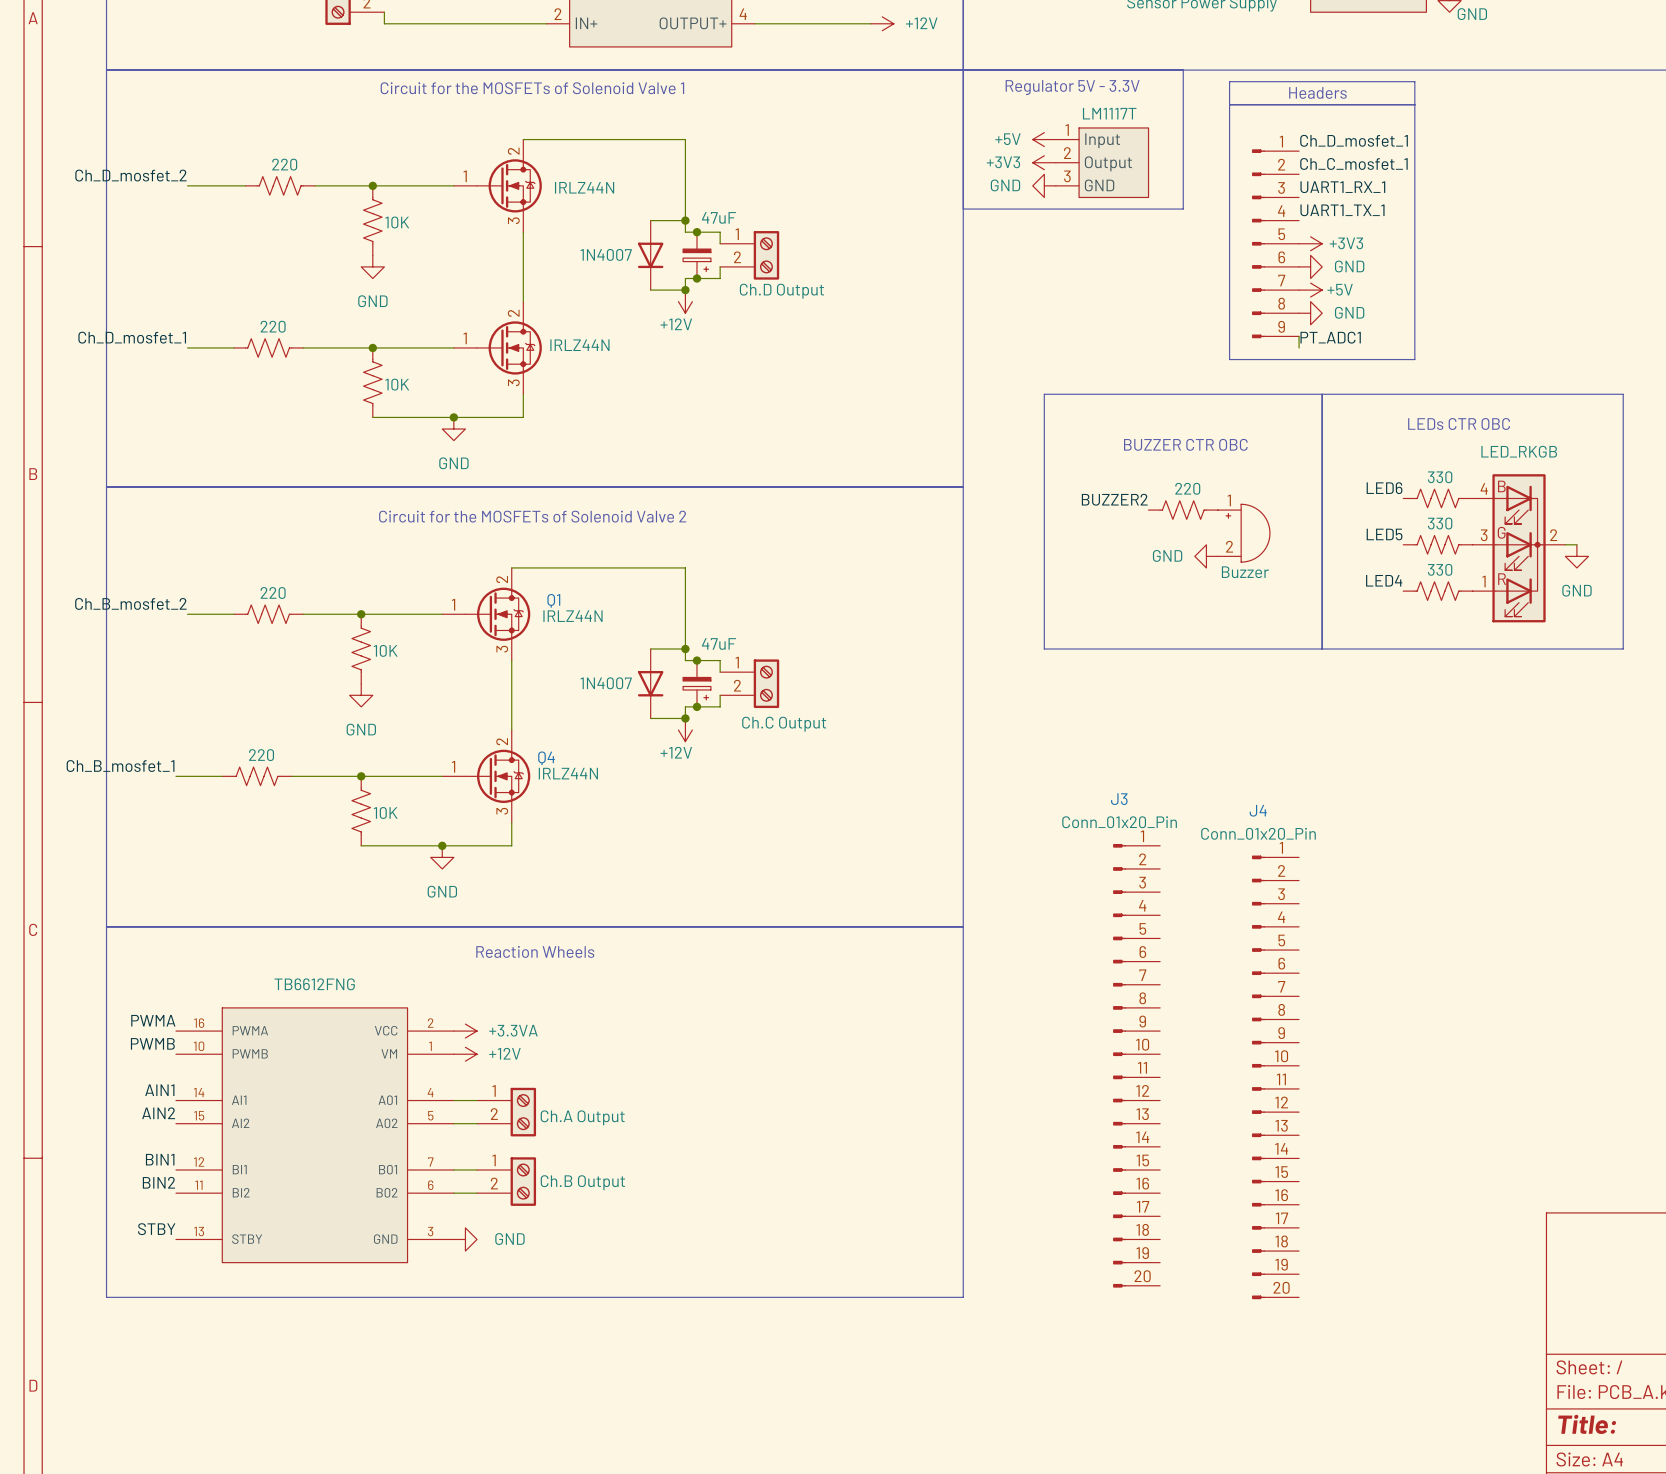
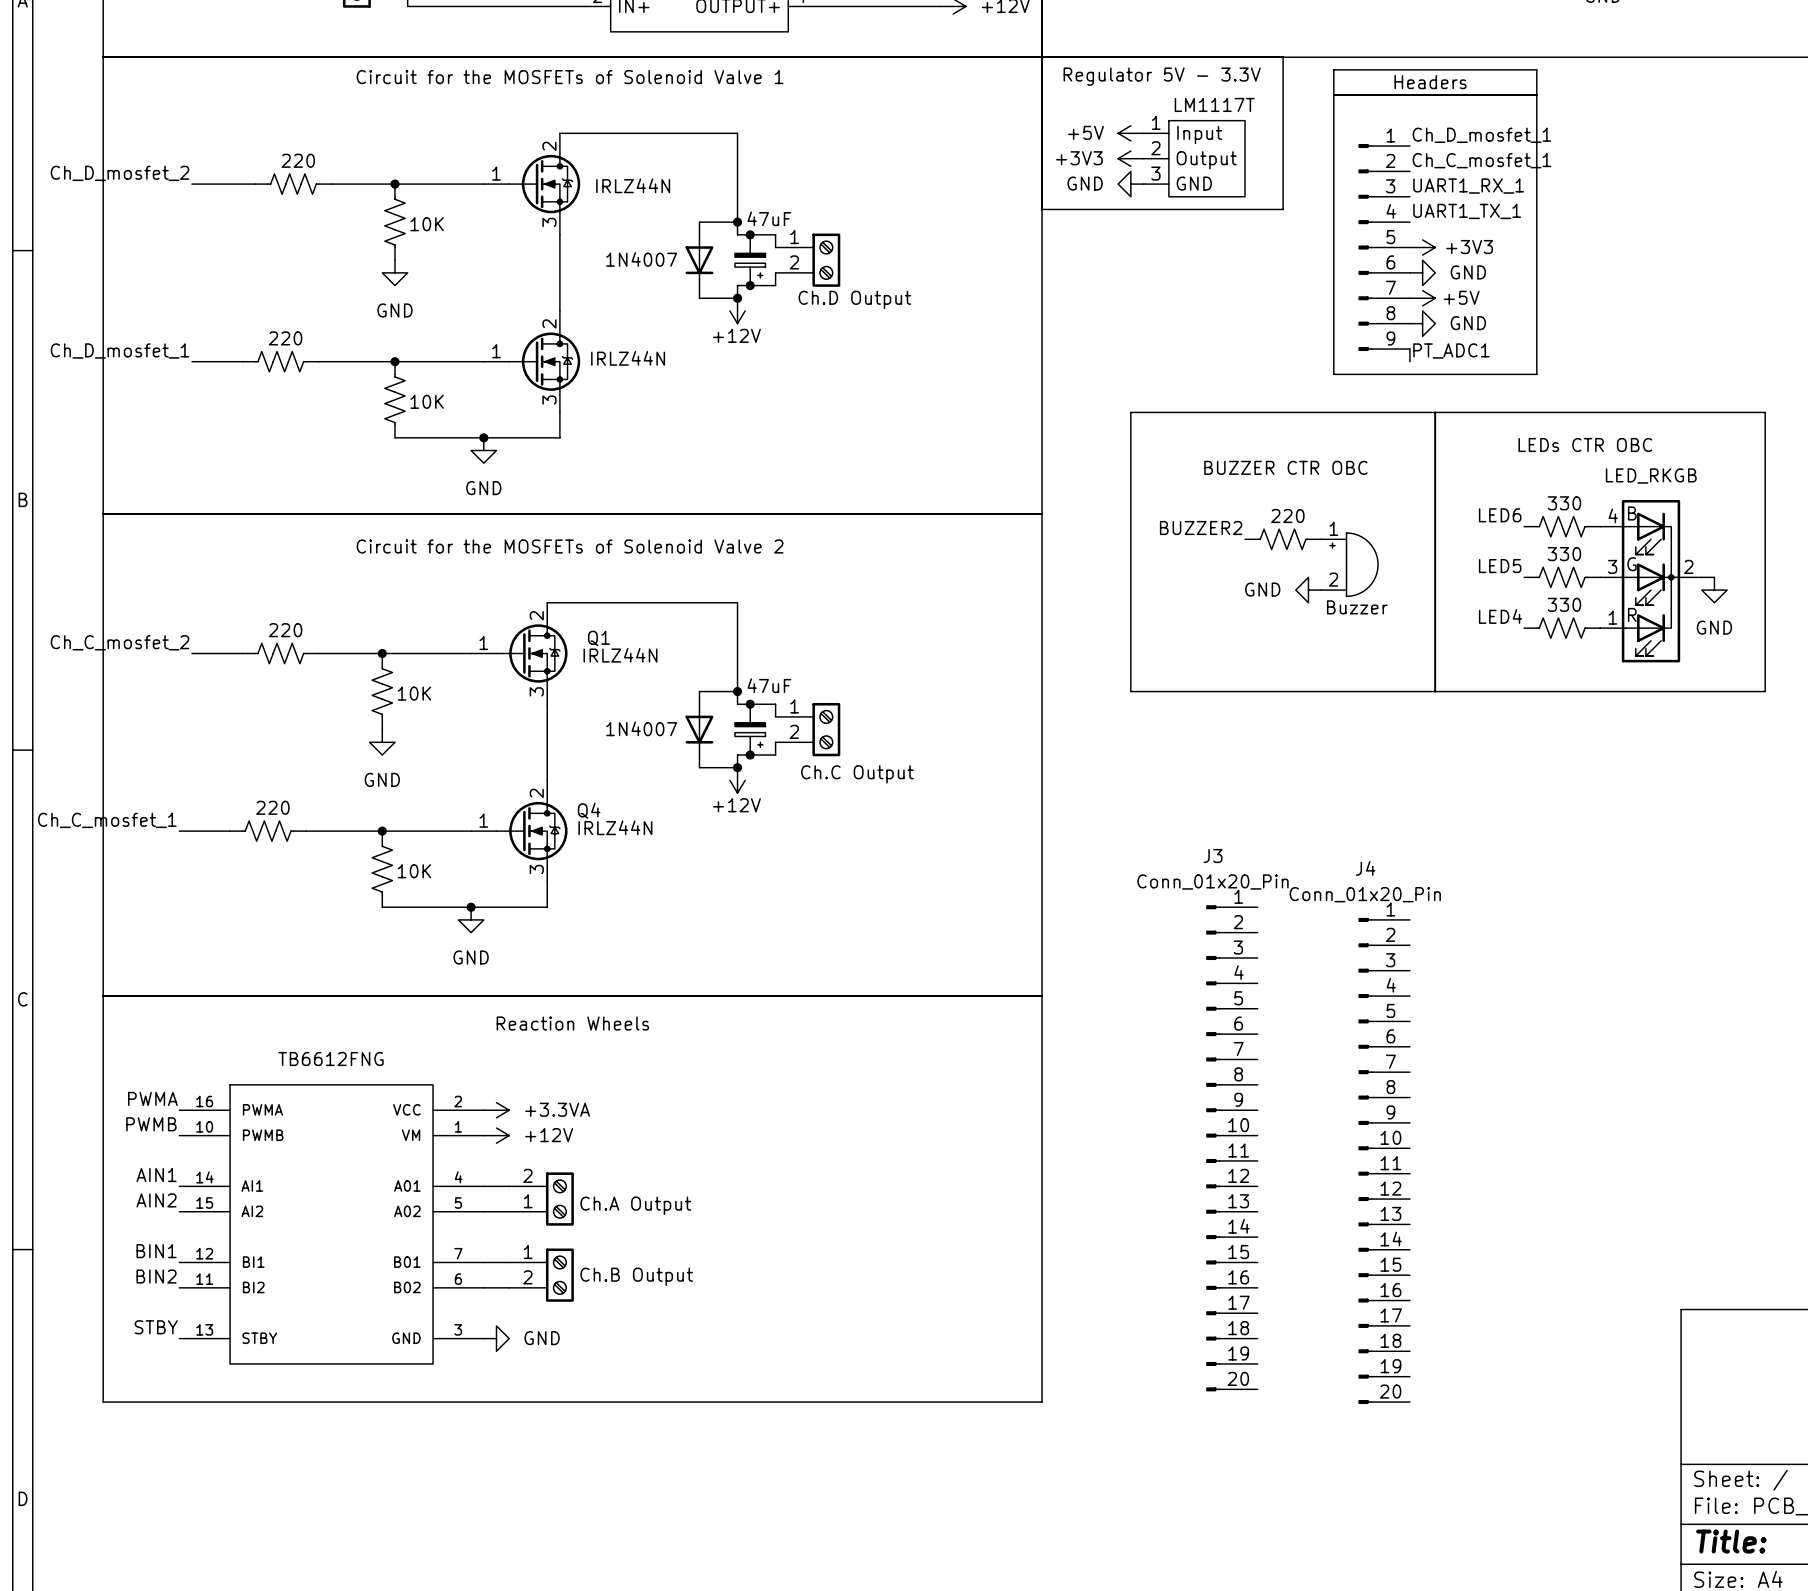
label: Ch_B_mosfet_2 (130, 603) -> Ch_C_mosfet_2 (120, 642)
label: Ch_B_mosfet_1 (120, 766) -> Ch_C_mosfet_1 (107, 820)
part pin number: 1 (494, 1090) -> 2 (527, 1175)
part pin number: 2 (494, 1114) -> 1 (528, 1201)

